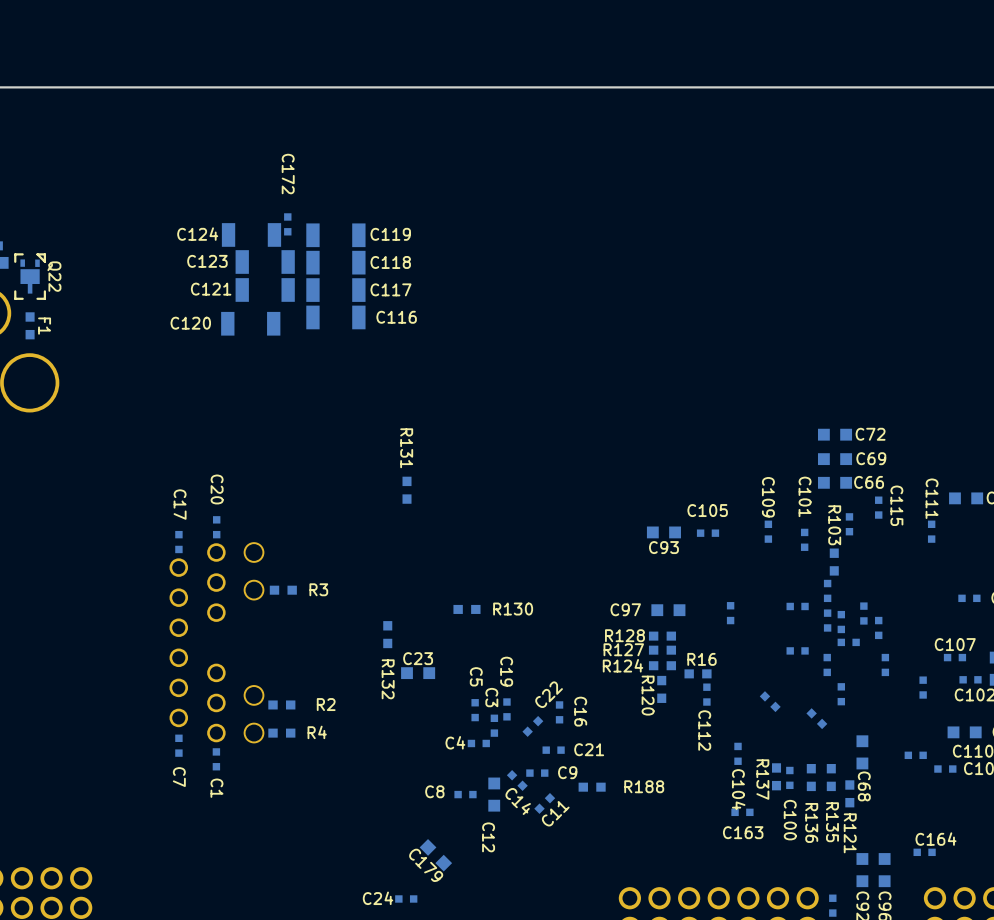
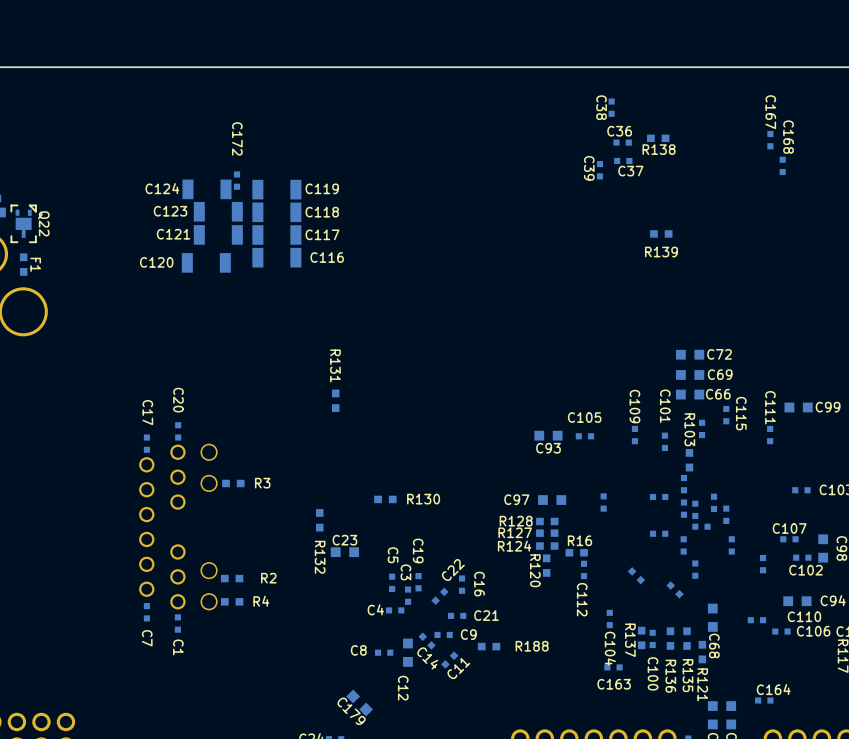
C38: none -> (611, 107)
R138: none -> (658, 138)
C167: none -> (770, 140)
C36: none -> (622, 142)
C37: none -> (623, 160)
C168: none -> (782, 165)
C39: none -> (599, 170)
R139: none -> (661, 233)

